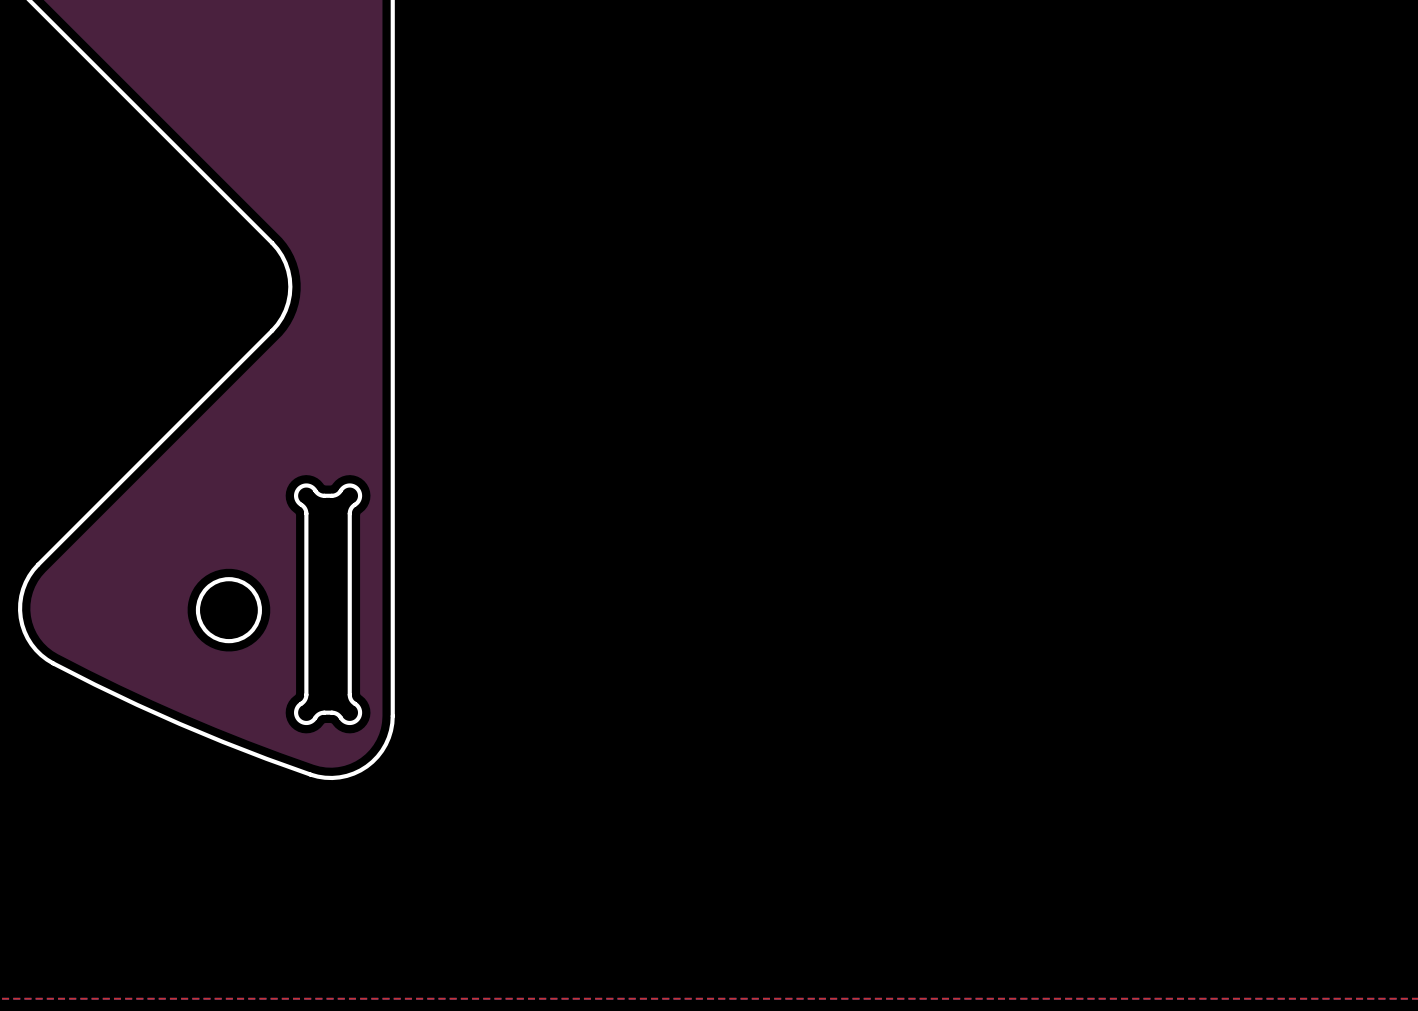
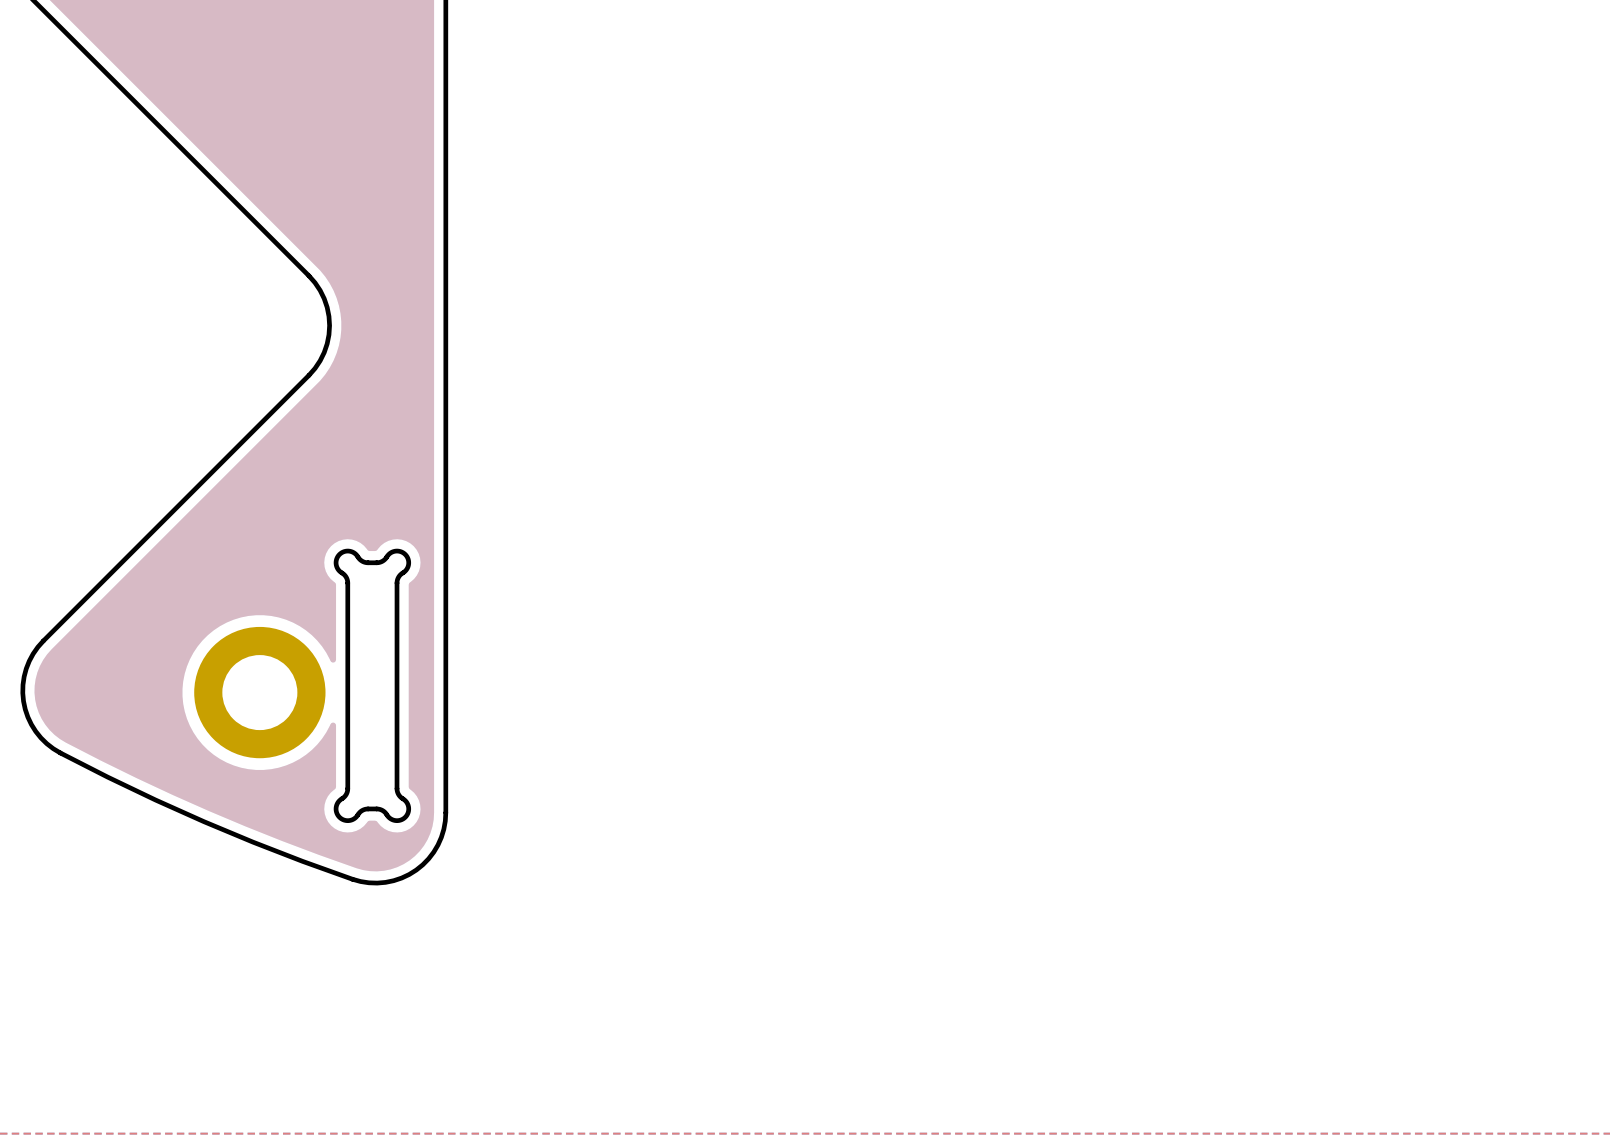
round board edge: [195, 577, 262, 644] -> none
part: none -> (259, 692)

